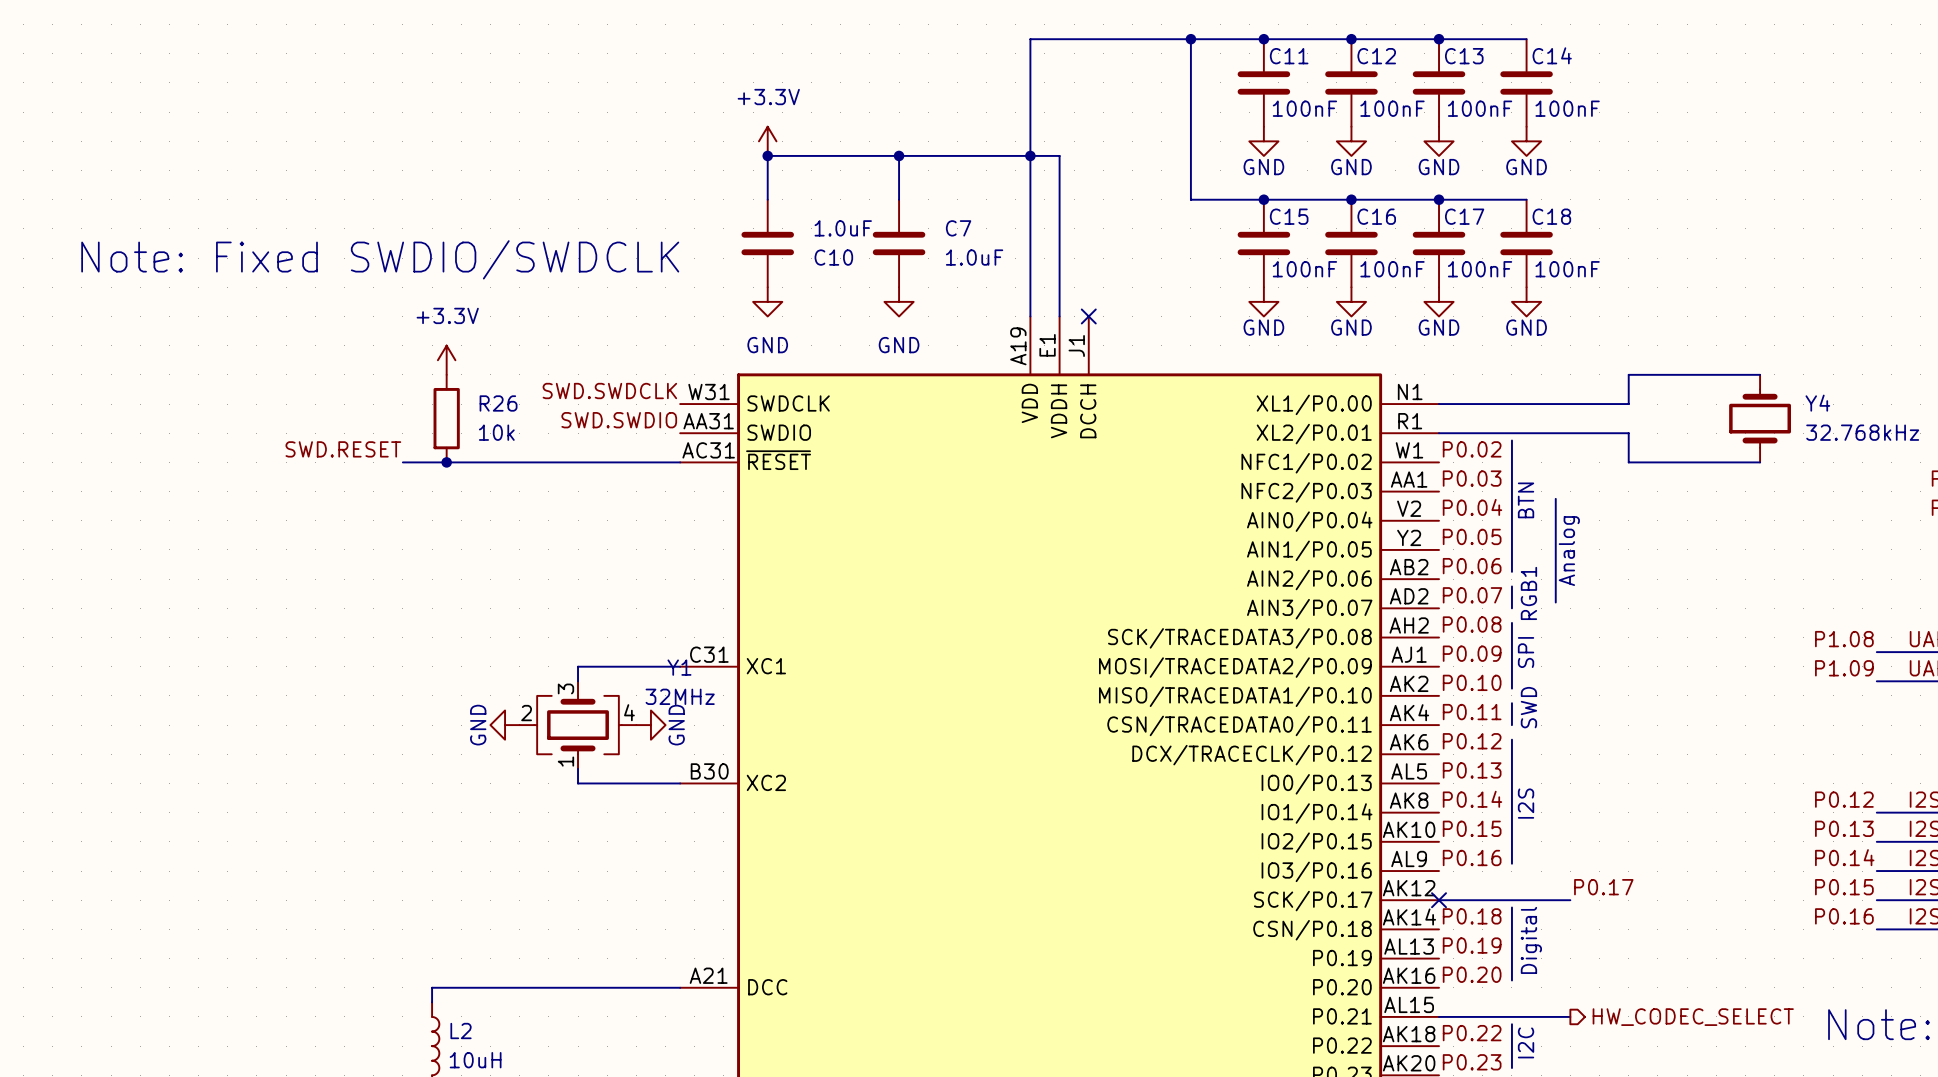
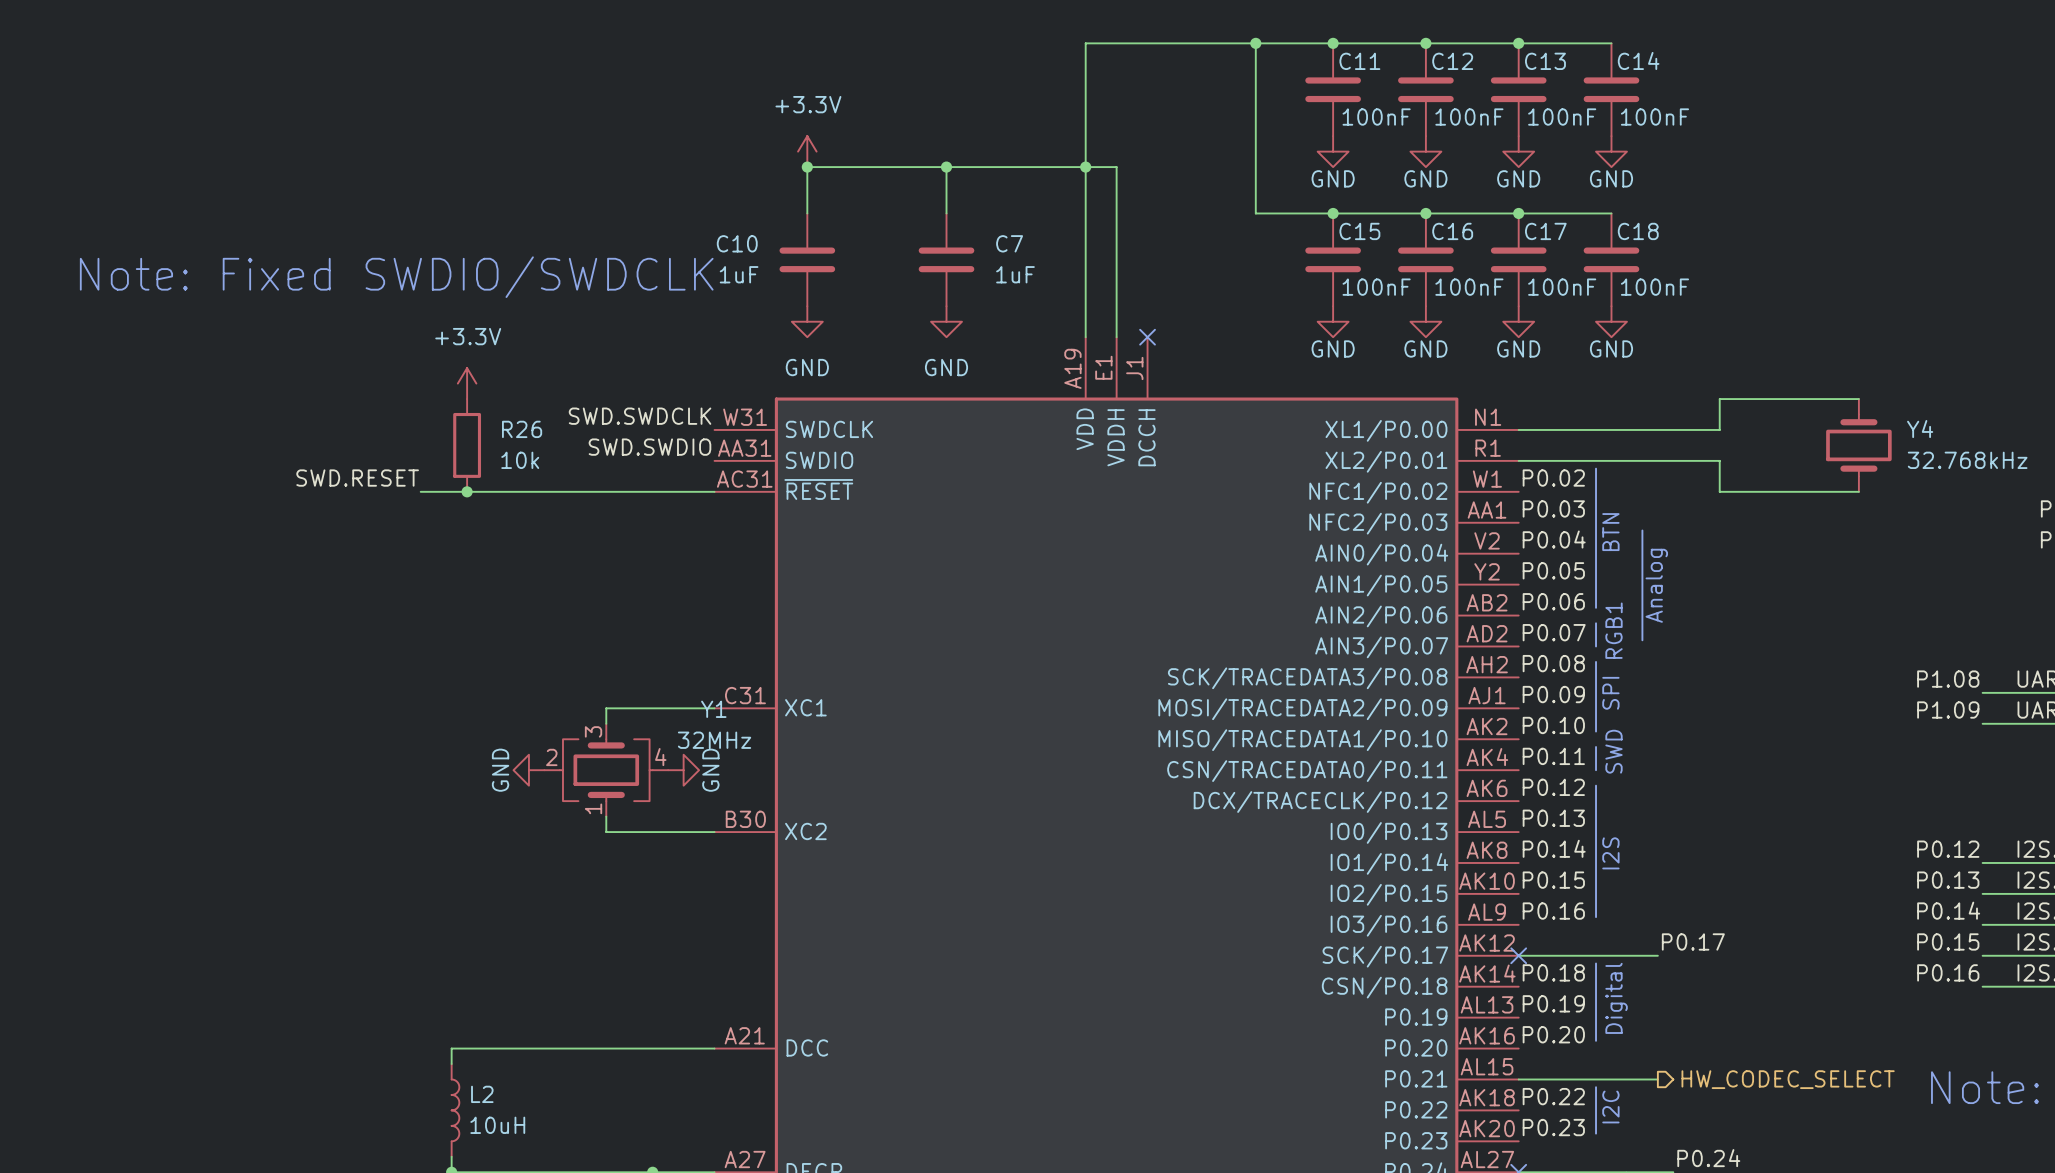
C10 value: 1.0uF (843, 228) -> 1uF (739, 274)
C10 name position: C10 (833, 257) -> C10 (737, 243)
C7 value: 1.0uF (974, 257) -> 1uF (1015, 274)

